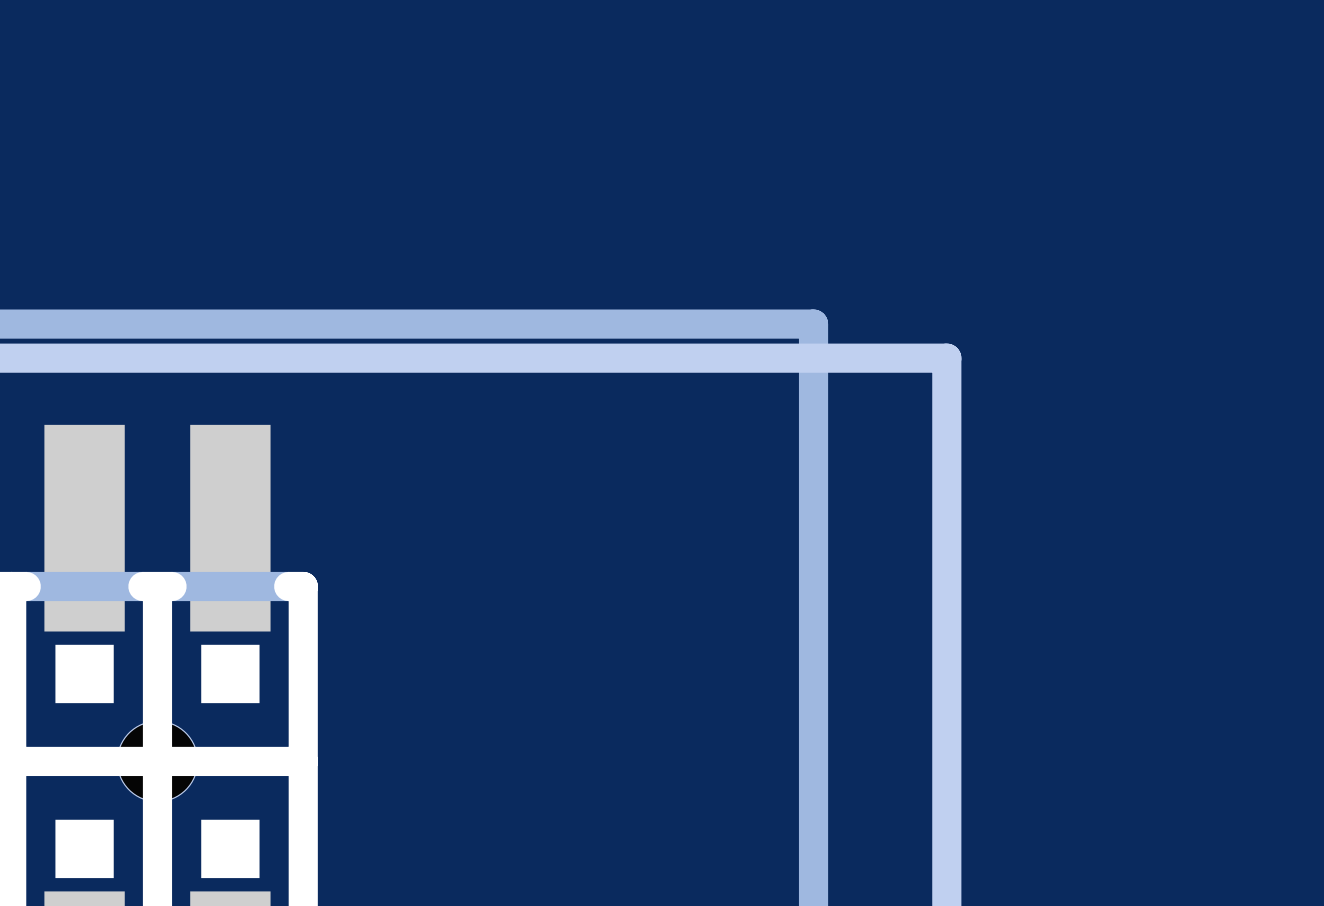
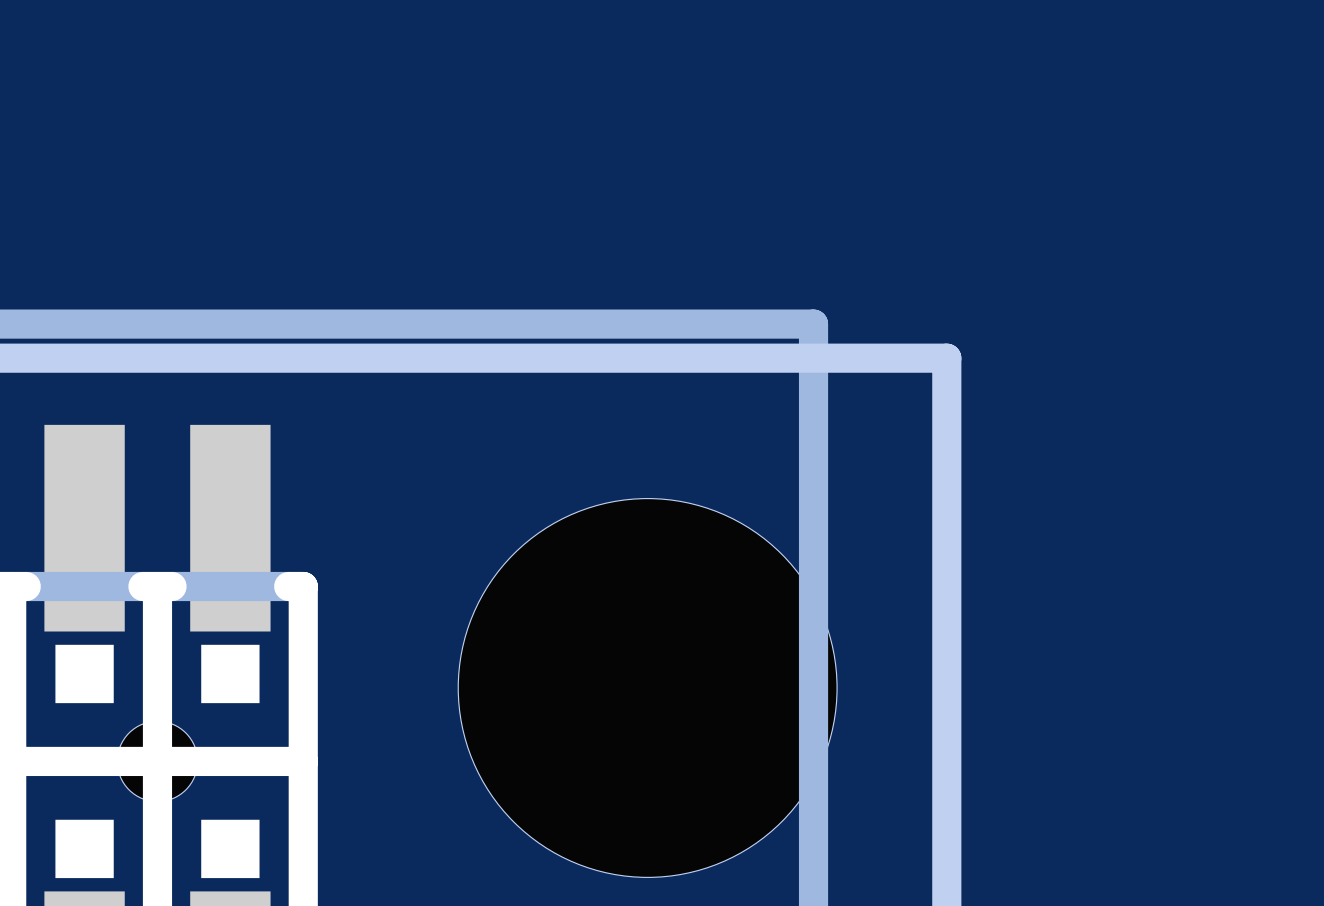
hole: none -> (647, 687)

